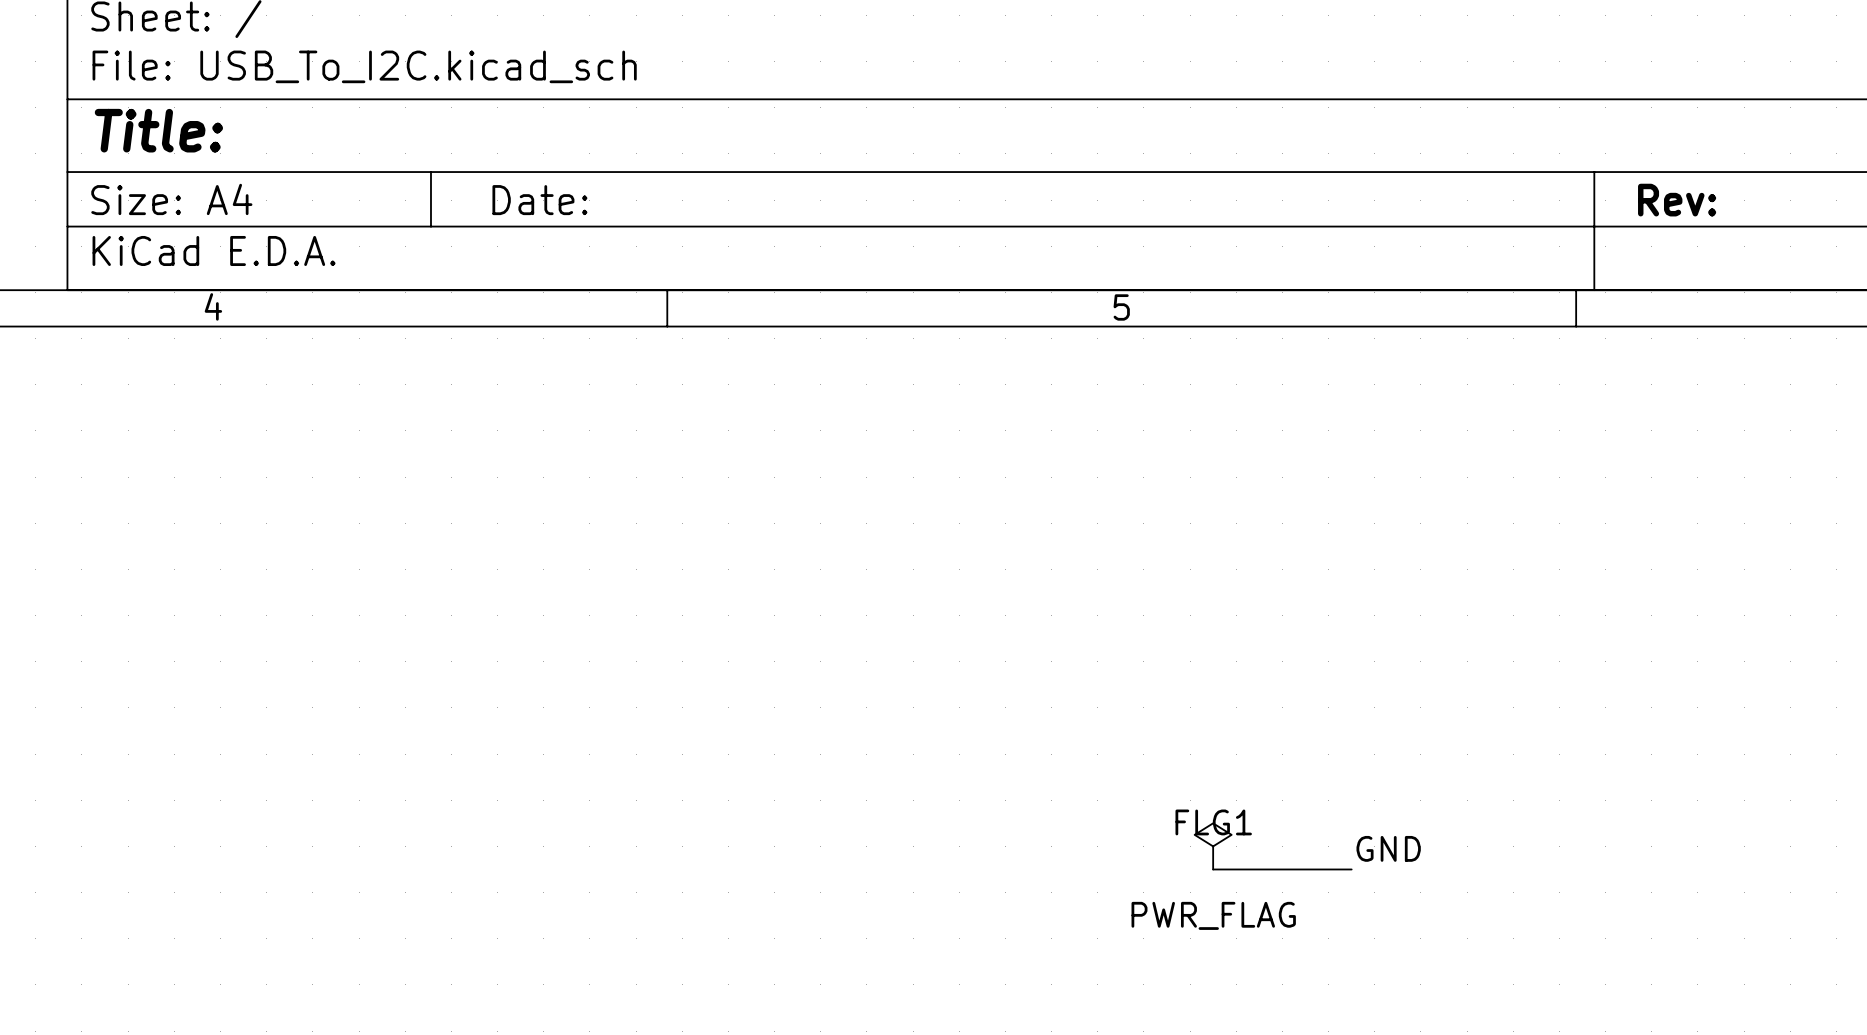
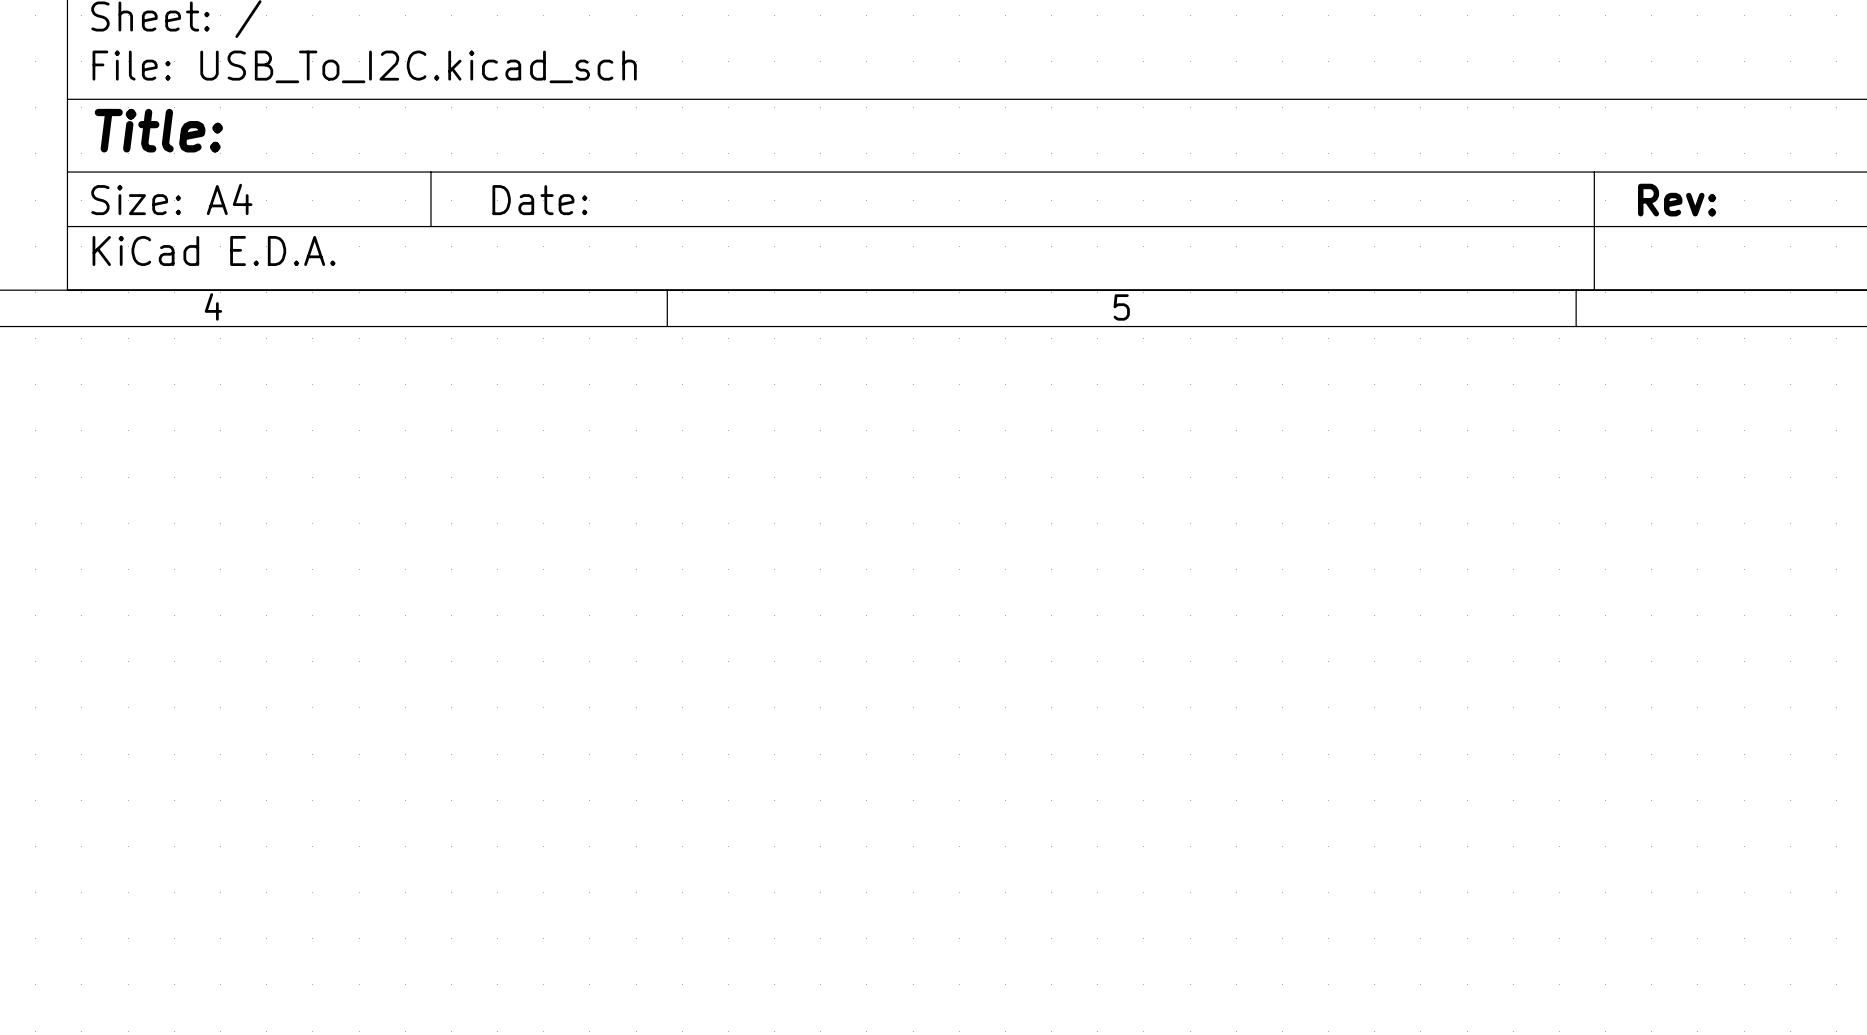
FLG1: PWR_FLAG (1213, 846) -> none
label: GND (1388, 848) -> none
wire: (1213, 869) (1351, 869) -> none

